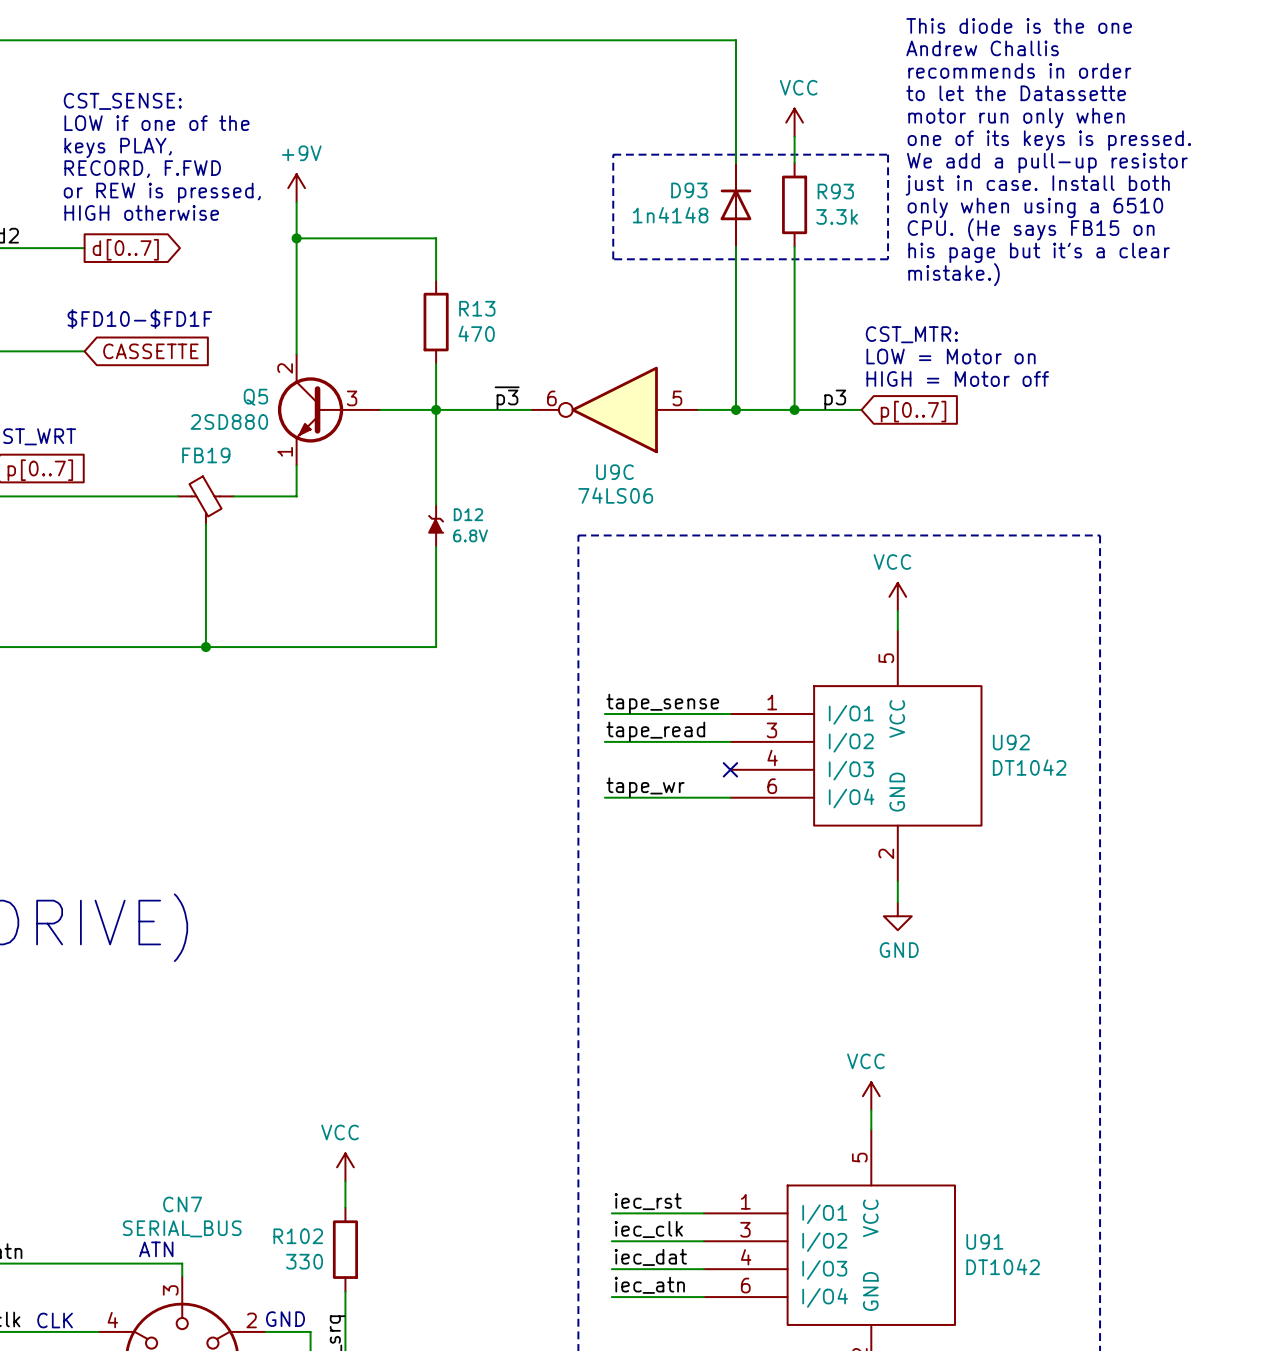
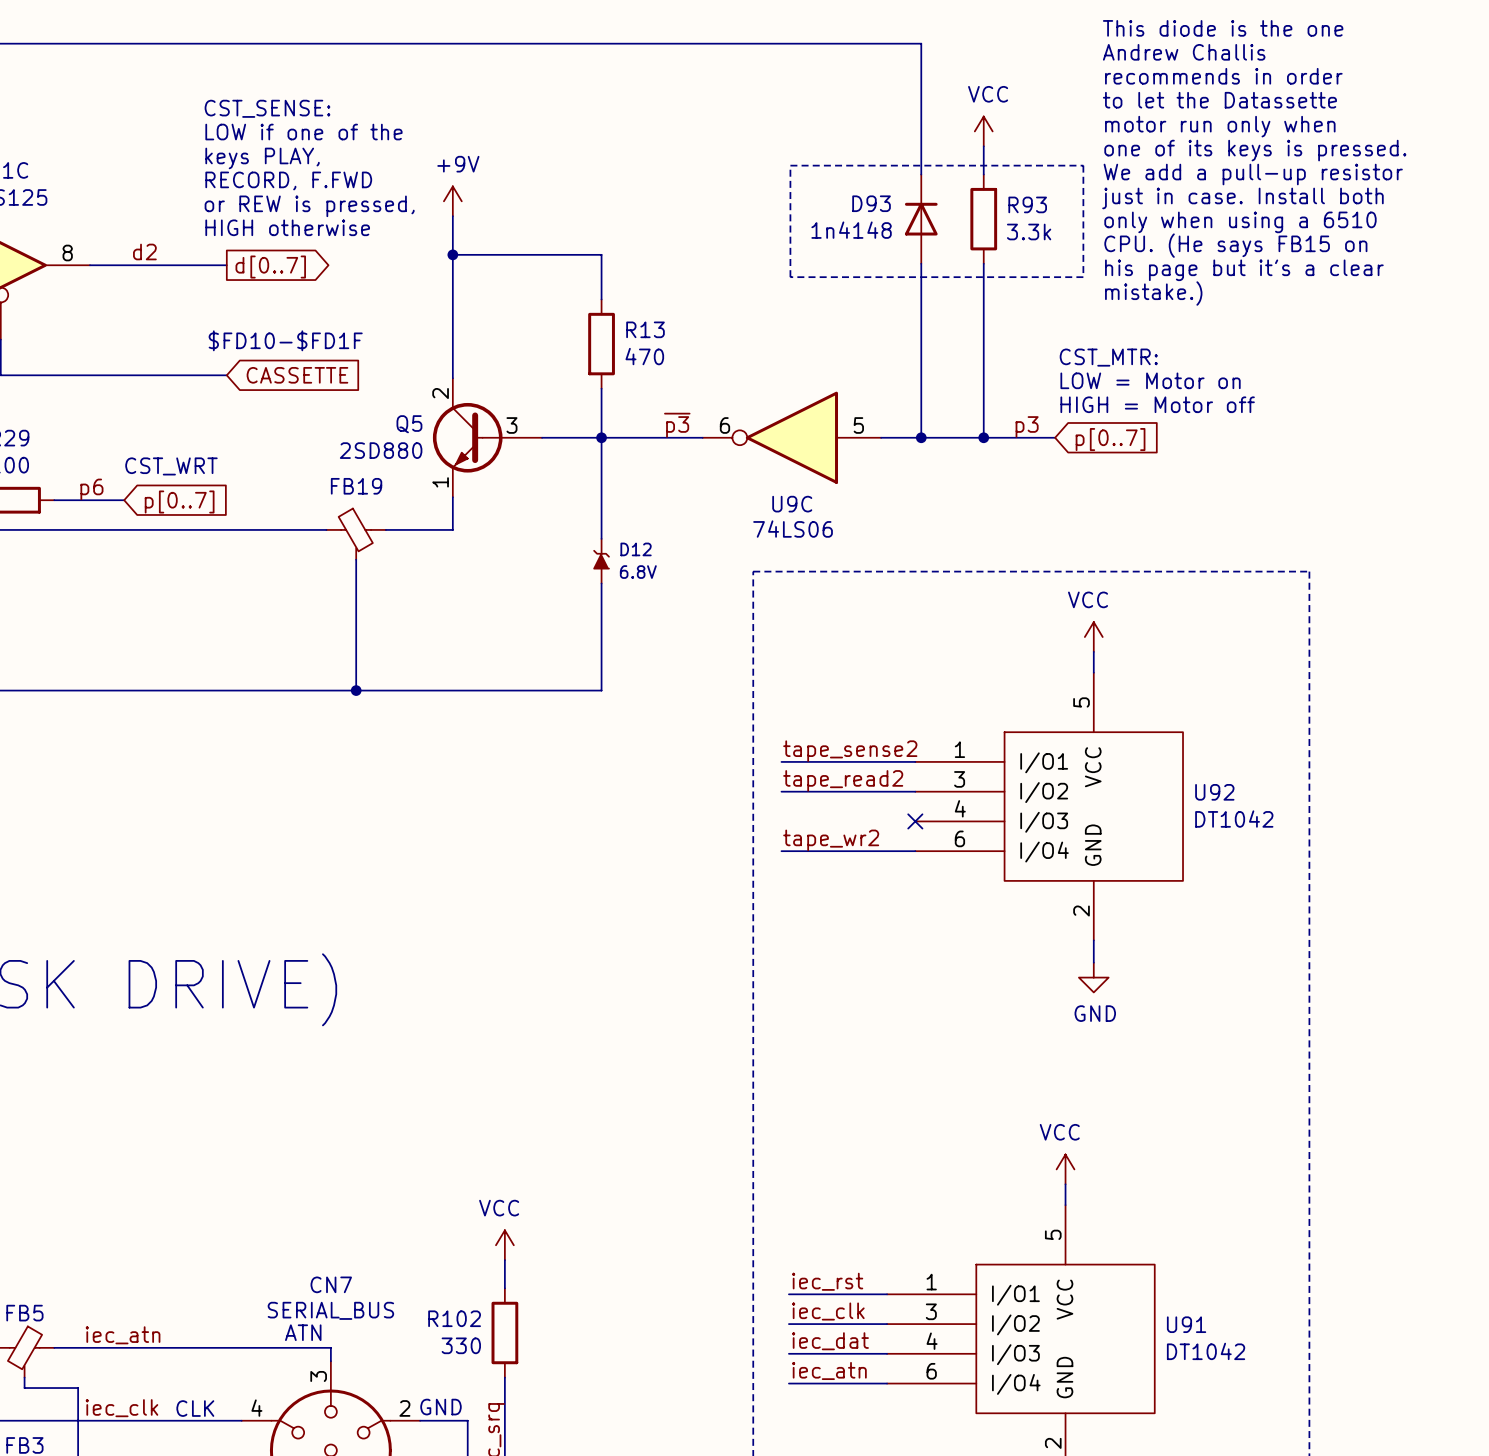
label: tape_sense (662, 703) -> tape_sense2 (850, 751)
label: tape_read (655, 731) -> tape_read2 (843, 780)
label: tape_wr (645, 787) -> tape_wr2 (831, 840)

